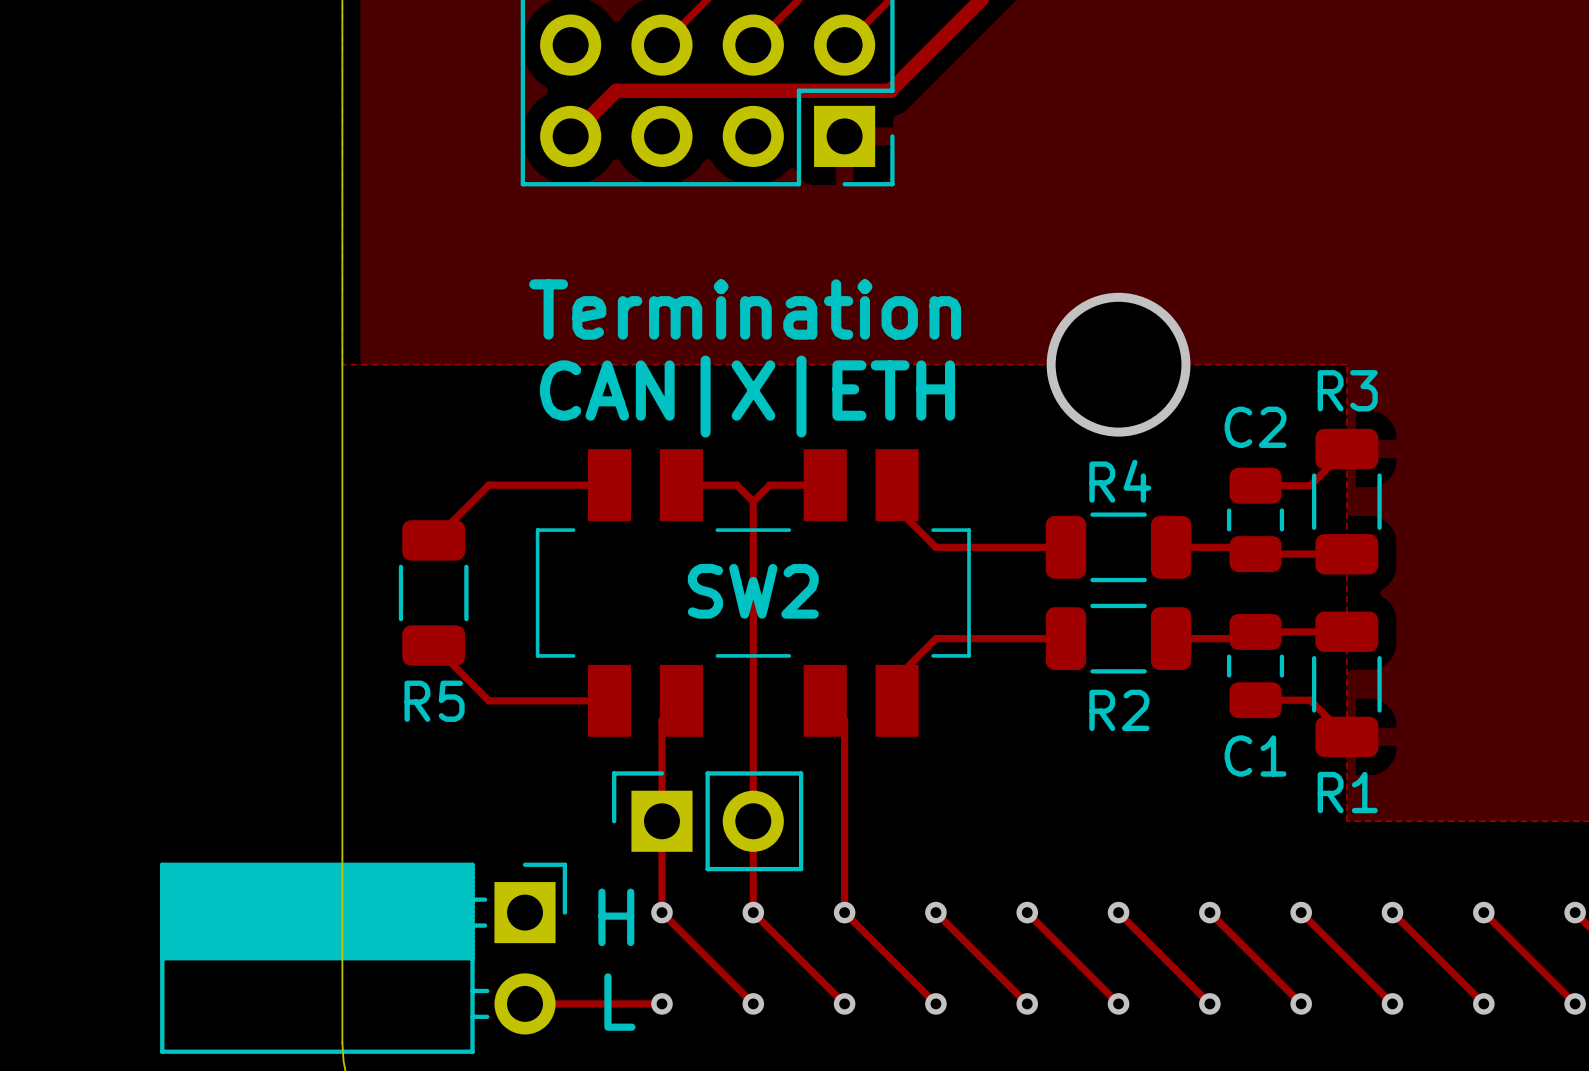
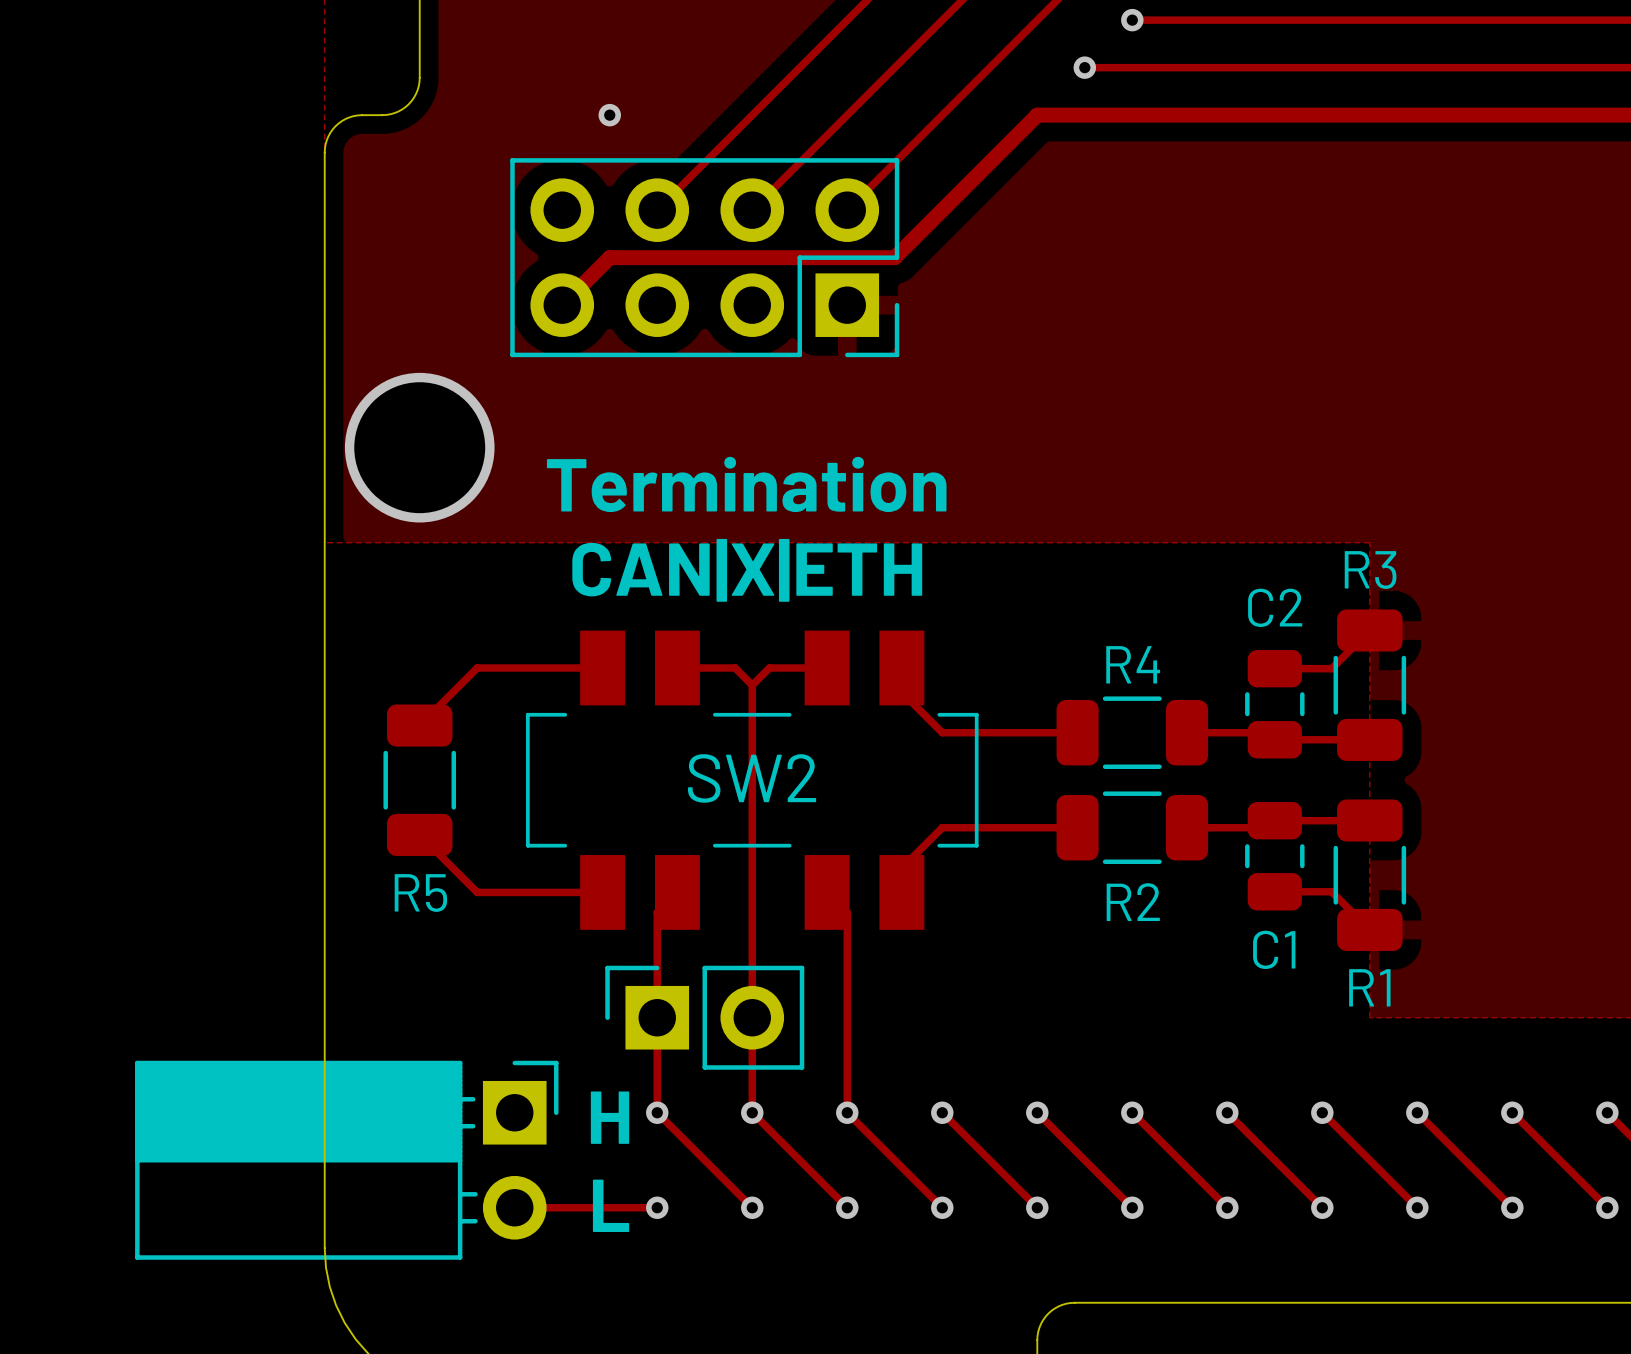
via: none -> (419, 447)
via: (1118, 364) -> none

